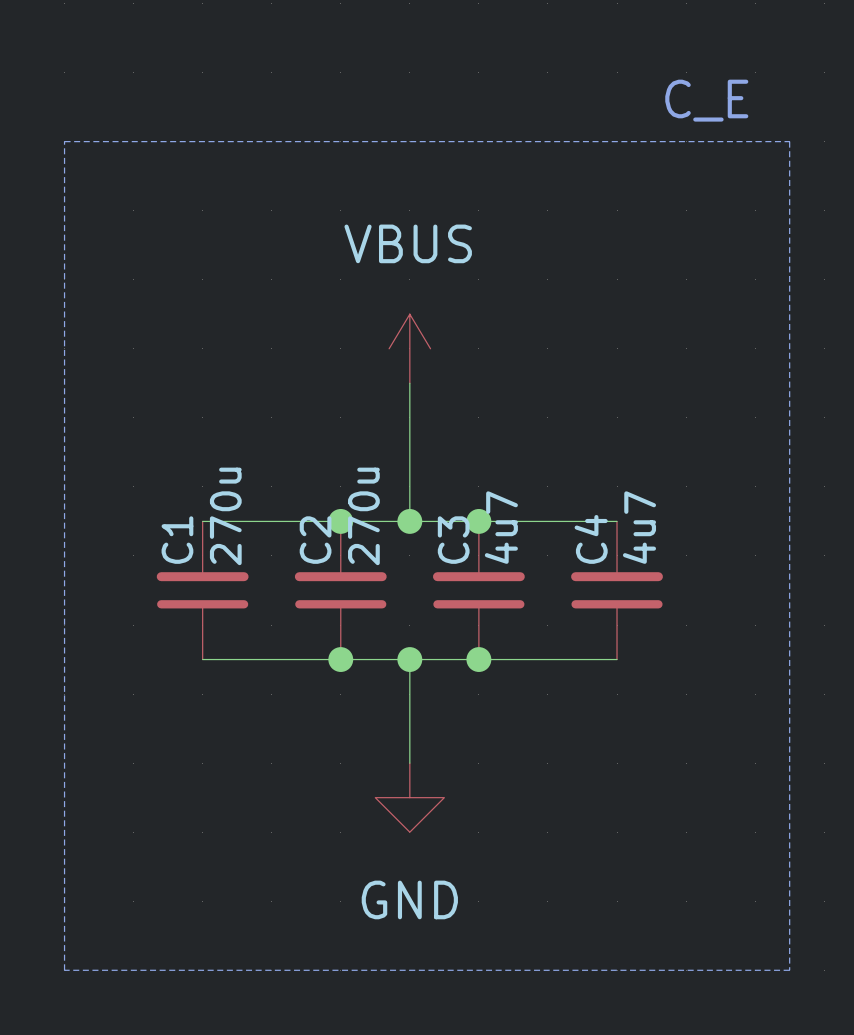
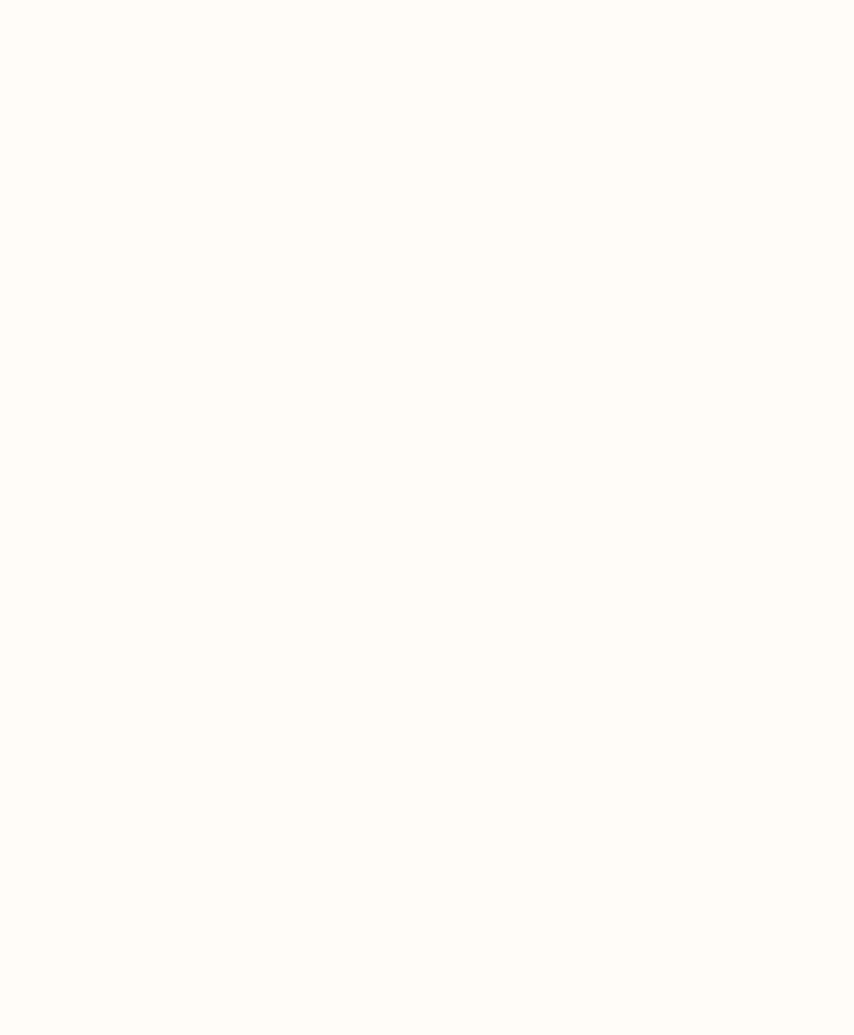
text: C_E (706, 100) -> none
line: (64, 141) (789, 141) (789, 970) (64, 970) (64, 141) -> none
power symbol: VBUS (409, 348) -> none
wire: (409, 383) (409, 521) -> none
wire: (202, 521) (617, 521) -> none
junction: (340, 521) -> none
junction: (409, 521) -> none
junction: (478, 521) -> none
C1: 270u (202, 590) -> none
C2: 270u (340, 590) -> none
C3: 4u7 (478, 590) -> none
C4: 4u7 (617, 590) -> none
wire: (202, 659) (617, 659) -> none
junction: (340, 659) -> none
wire: (409, 659) (409, 763) -> none
junction: (409, 659) -> none
junction: (478, 659) -> none
power symbol: GND (409, 797) -> none

